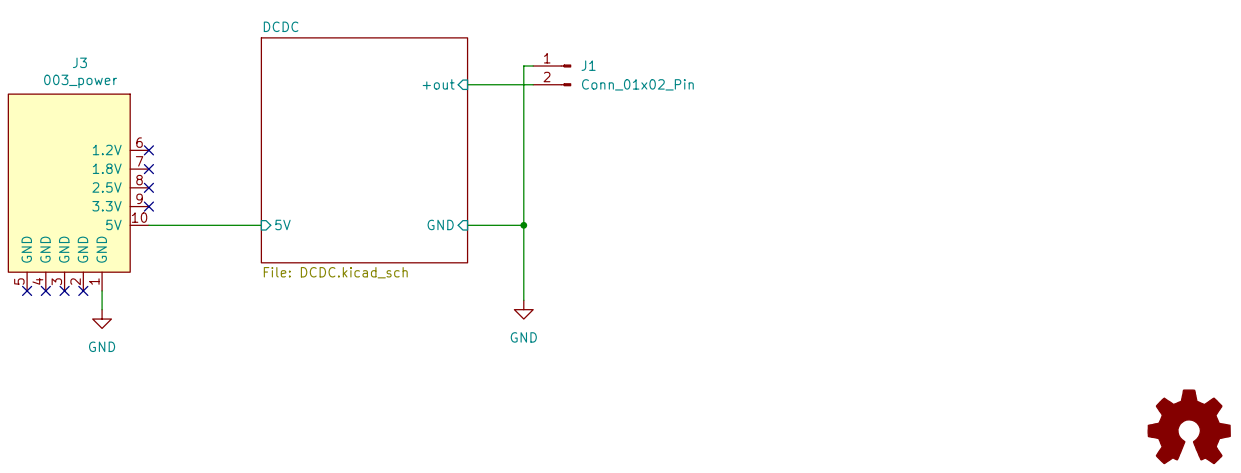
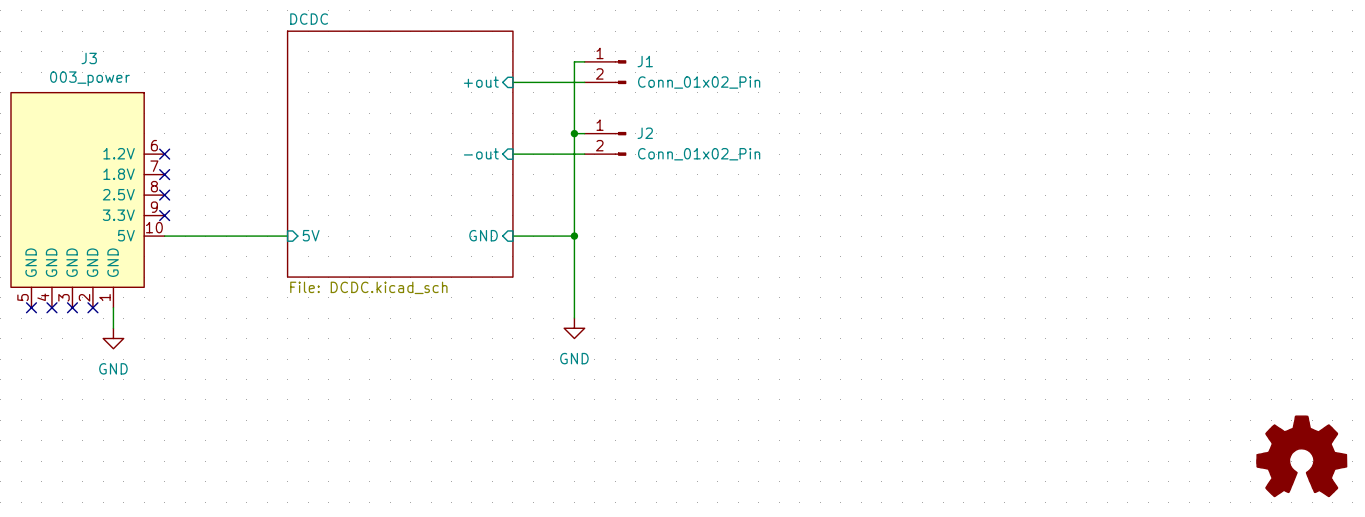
wire: none -> (574, 133) (584, 133)
junction: none -> (574, 133)
J2: none -> Conn_01x02_Pin (605, 143)
sheet pin: none -> -out (481, 153)
wire: none -> (512, 154) (584, 154)

